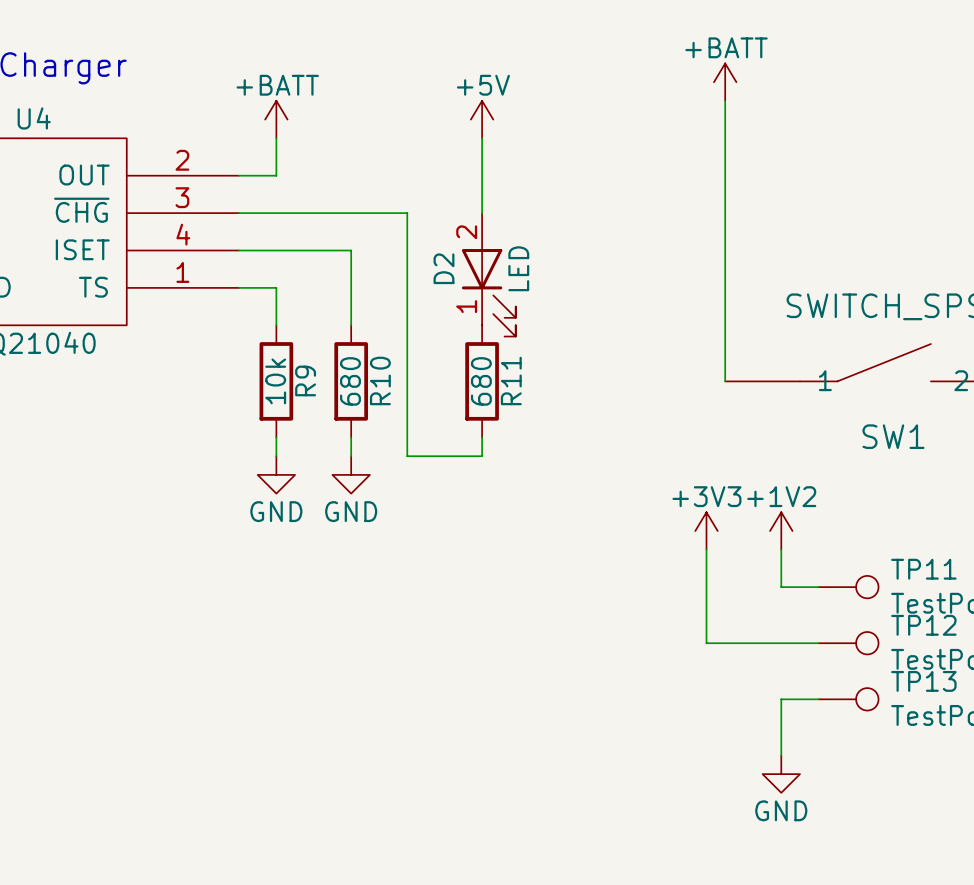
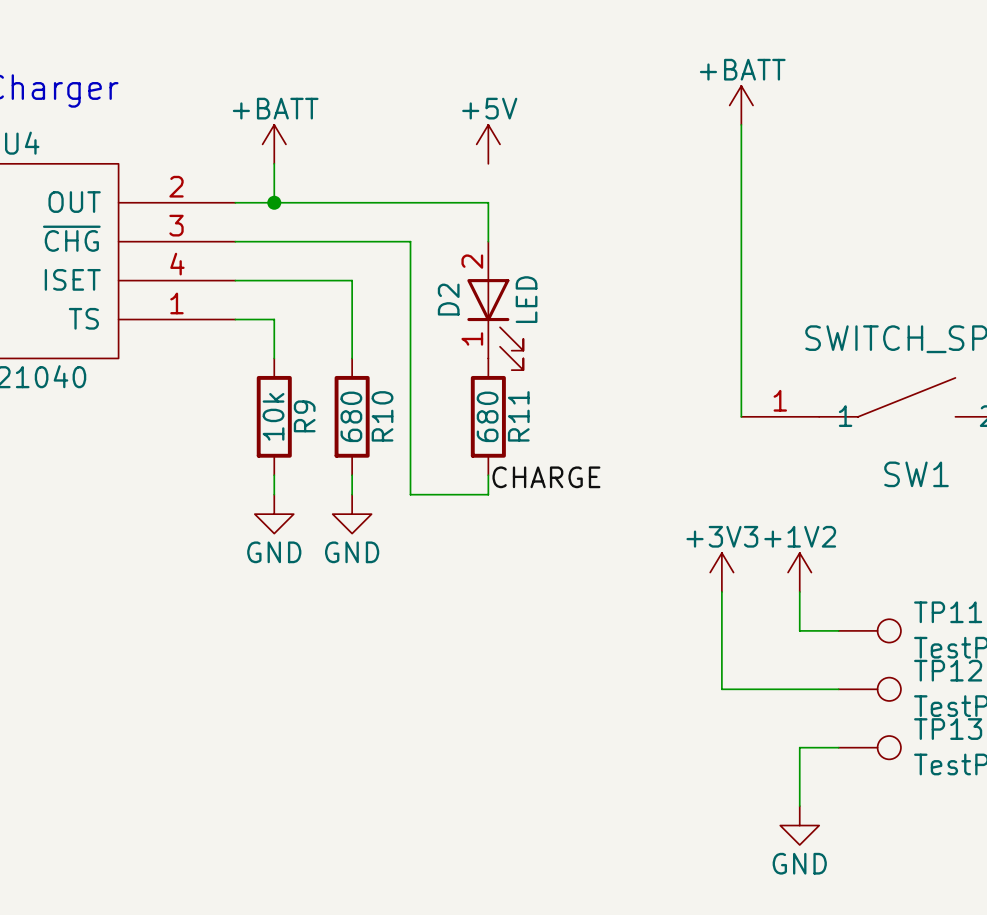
wire: (482, 138) (482, 175) -> (274, 202) (488, 202)
junction: none -> (274, 202)
SW1 pin number: none -> 1 (780, 400)
label: none -> CHARGE (546, 477)

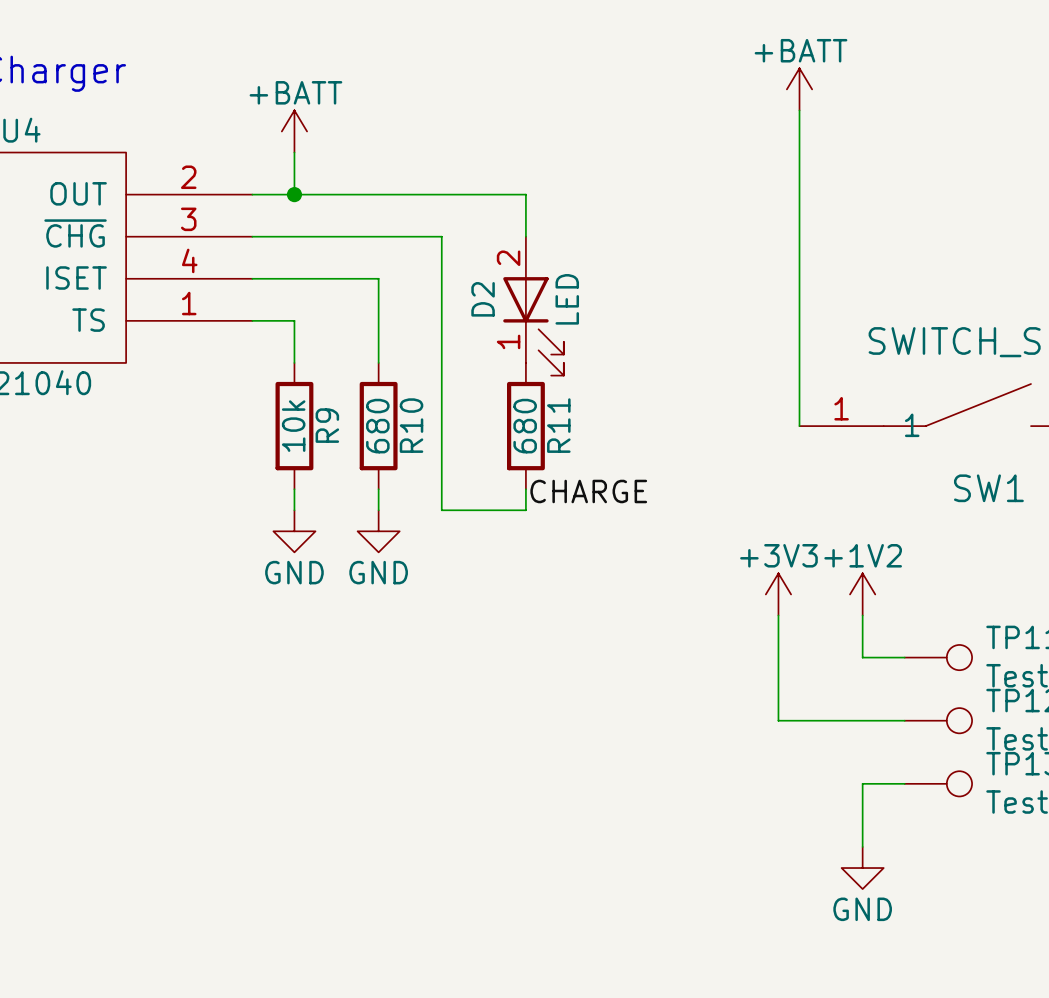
power symbol: +5V (488, 144) -> none

